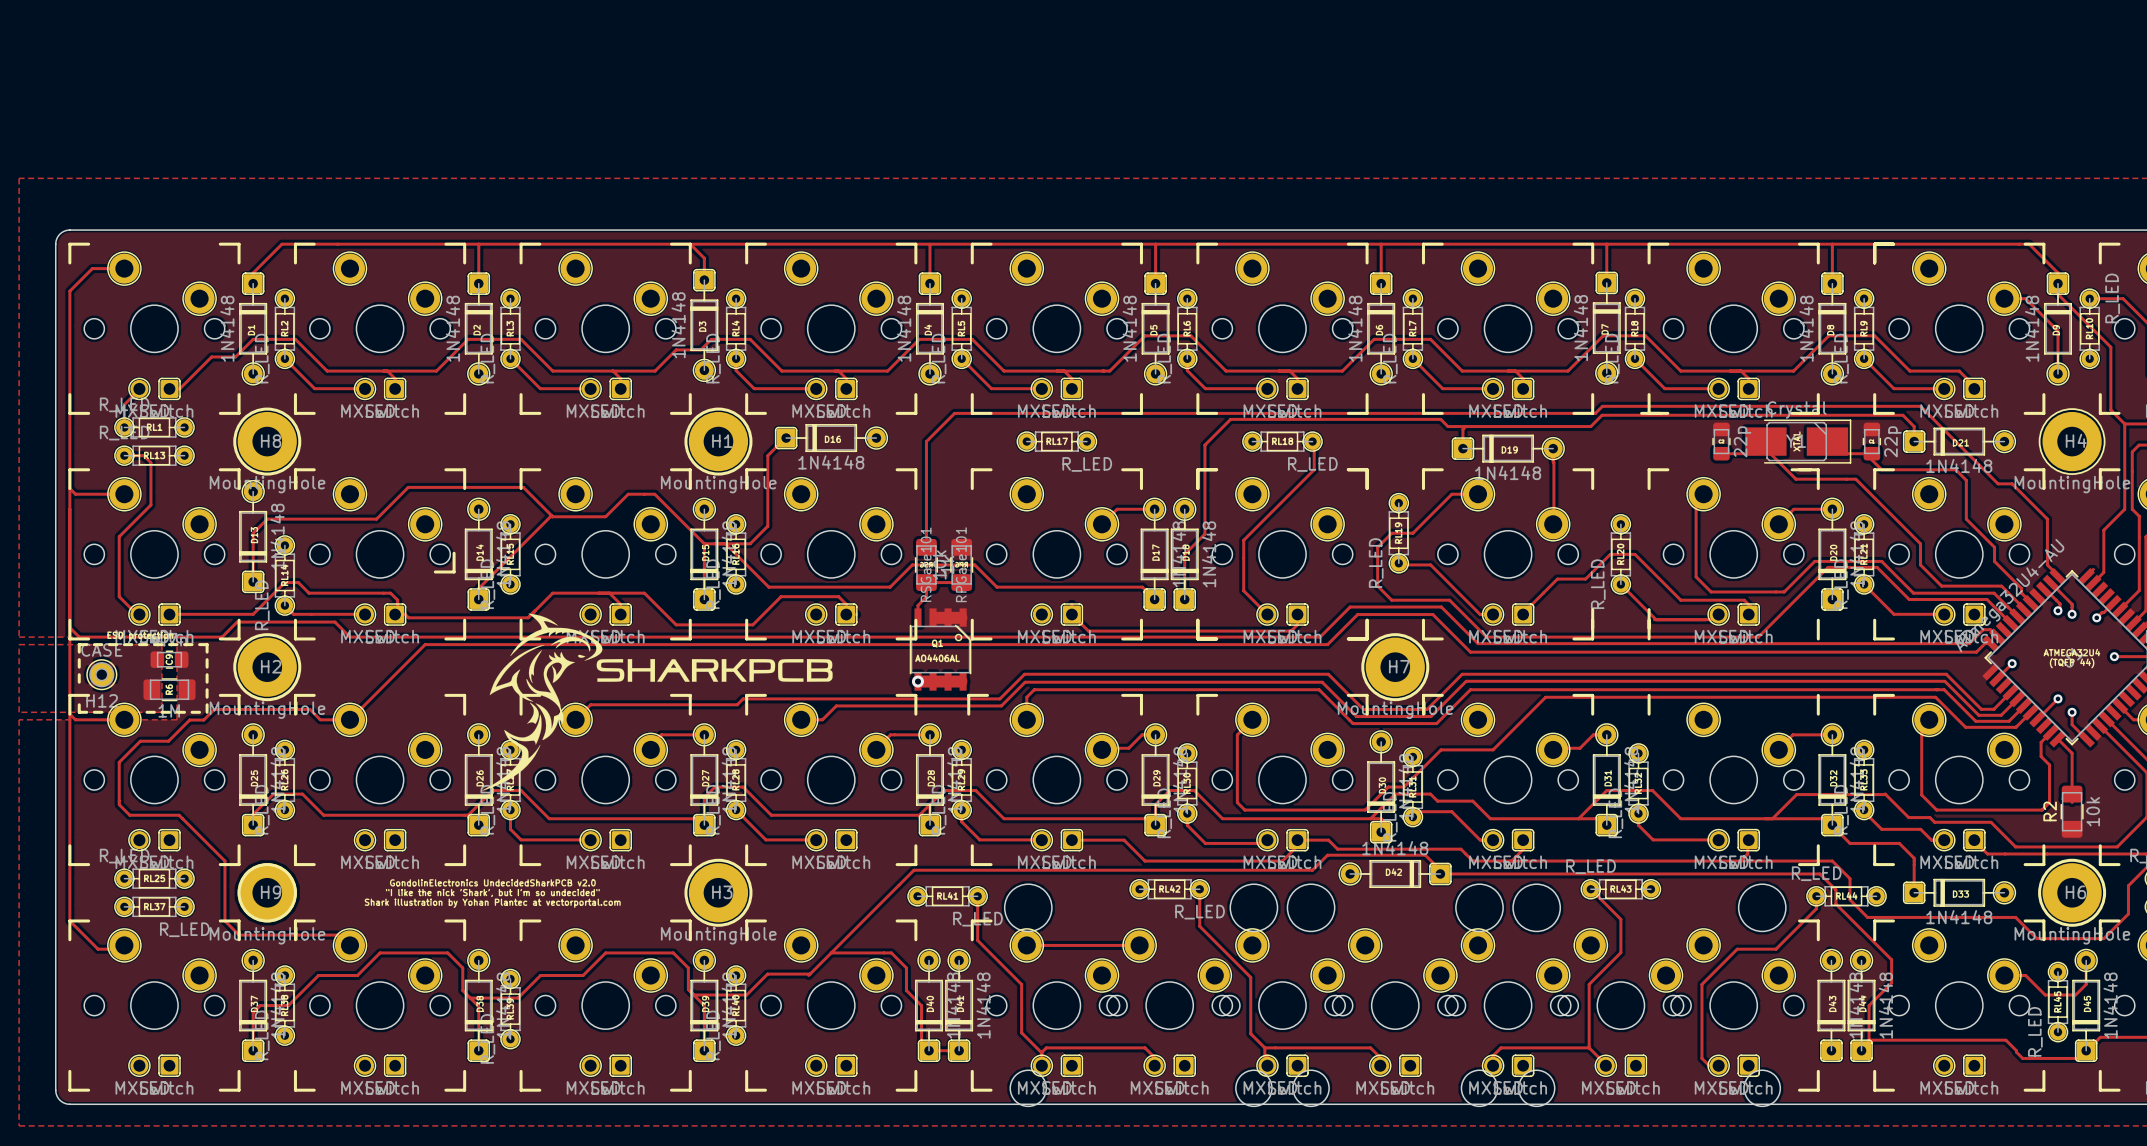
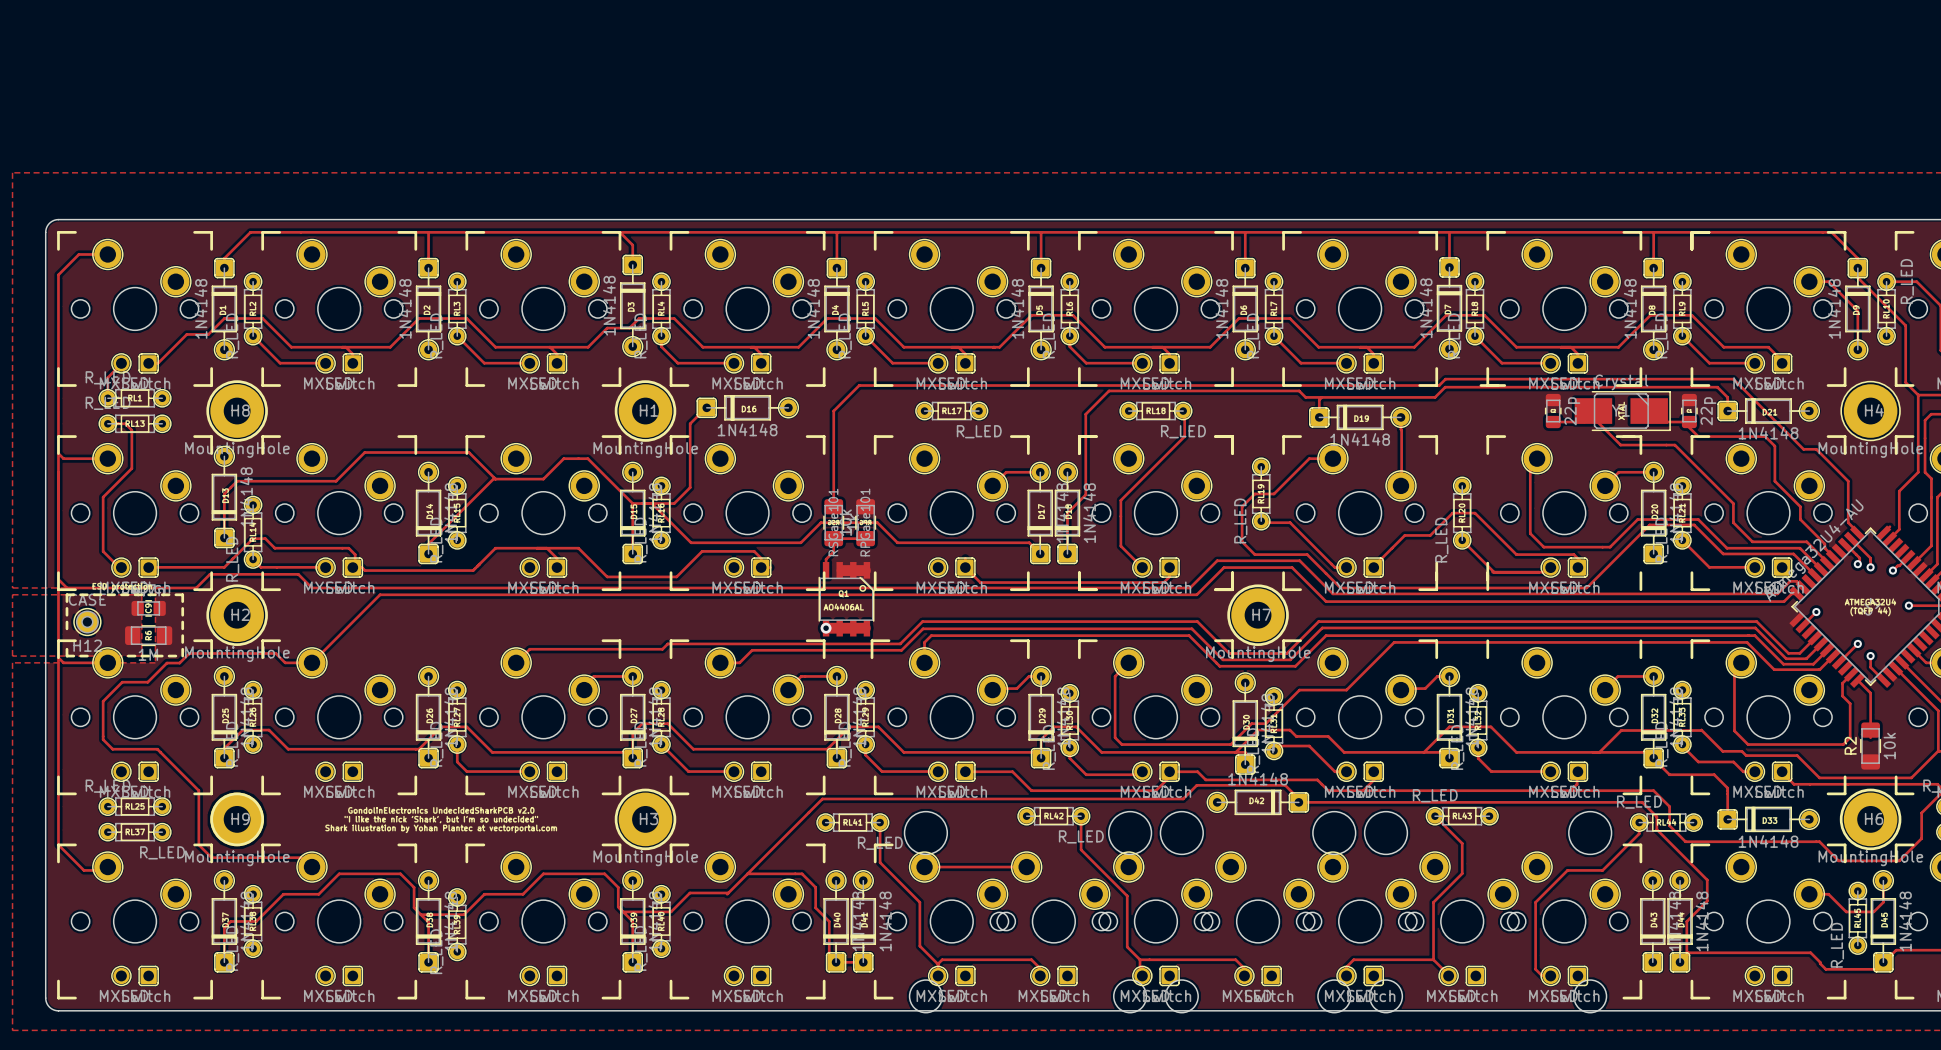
line: (454, 553) (454, 572) (435, 572) -> none
drawing: [480, 613, 833, 792] -> none
line: (464, 620) (464, 638) (445, 638) -> none
line: (521, 620) (521, 638) (539, 638) -> none
line: (445, 695) (464, 695) (464, 714) -> none
line: (539, 695) (521, 695) (521, 714) -> none

